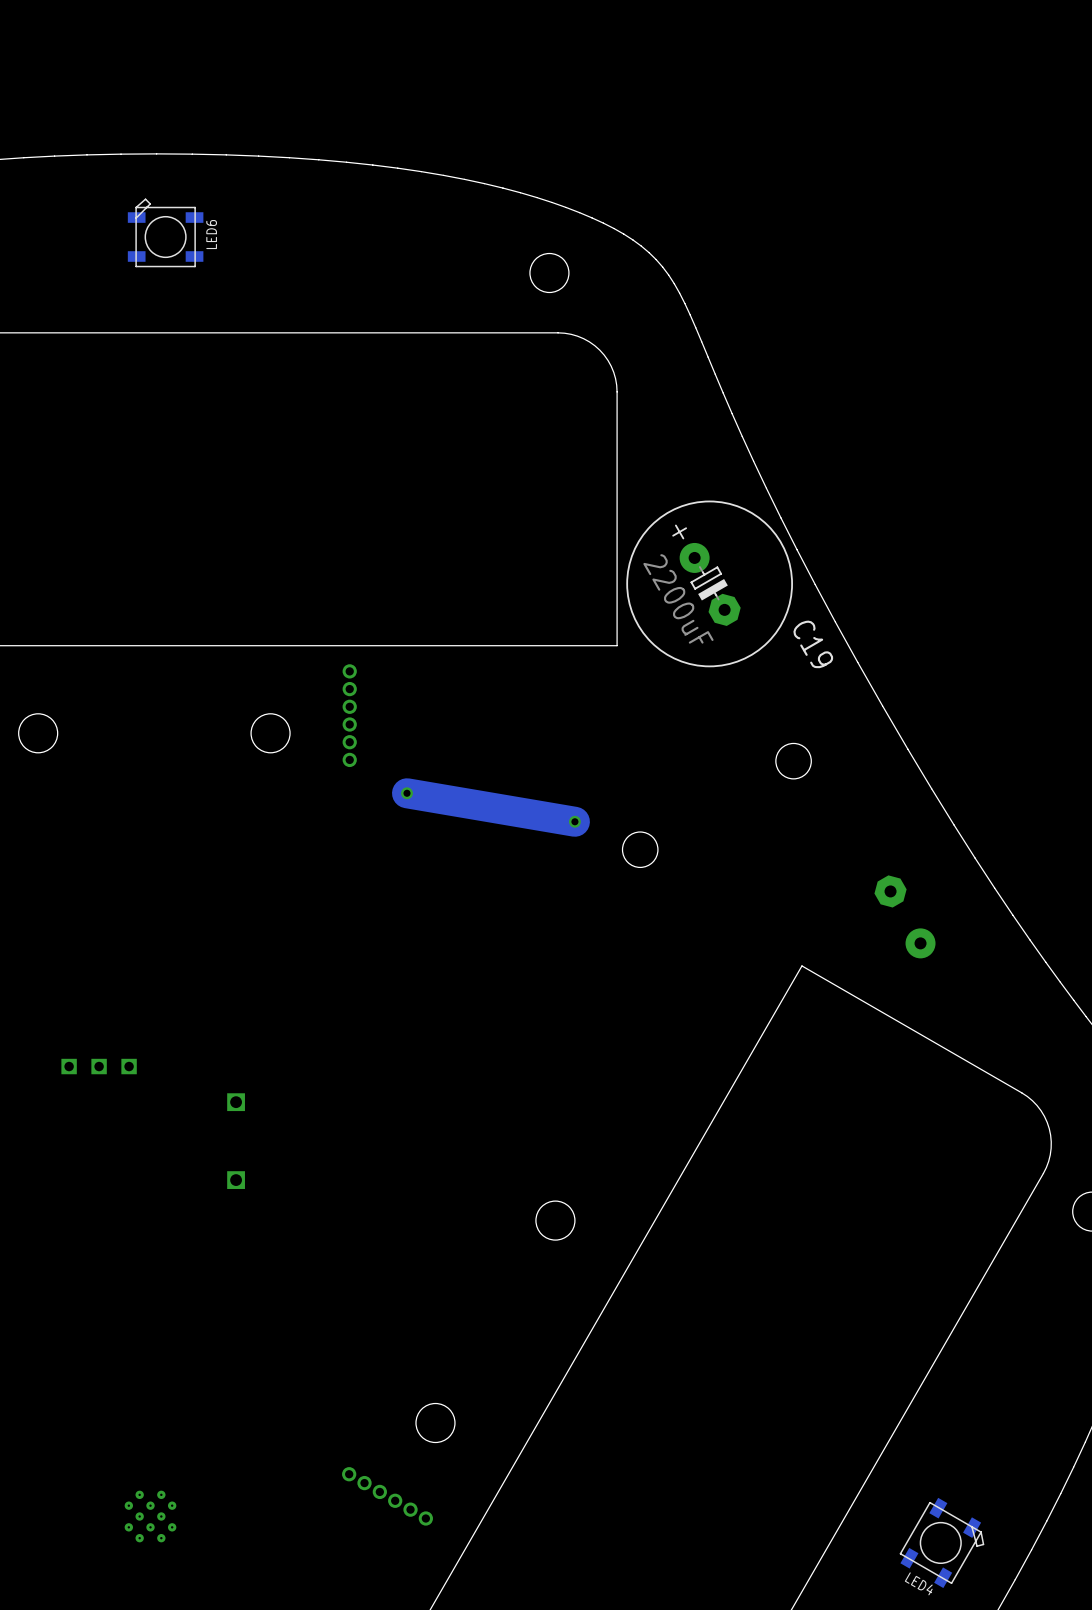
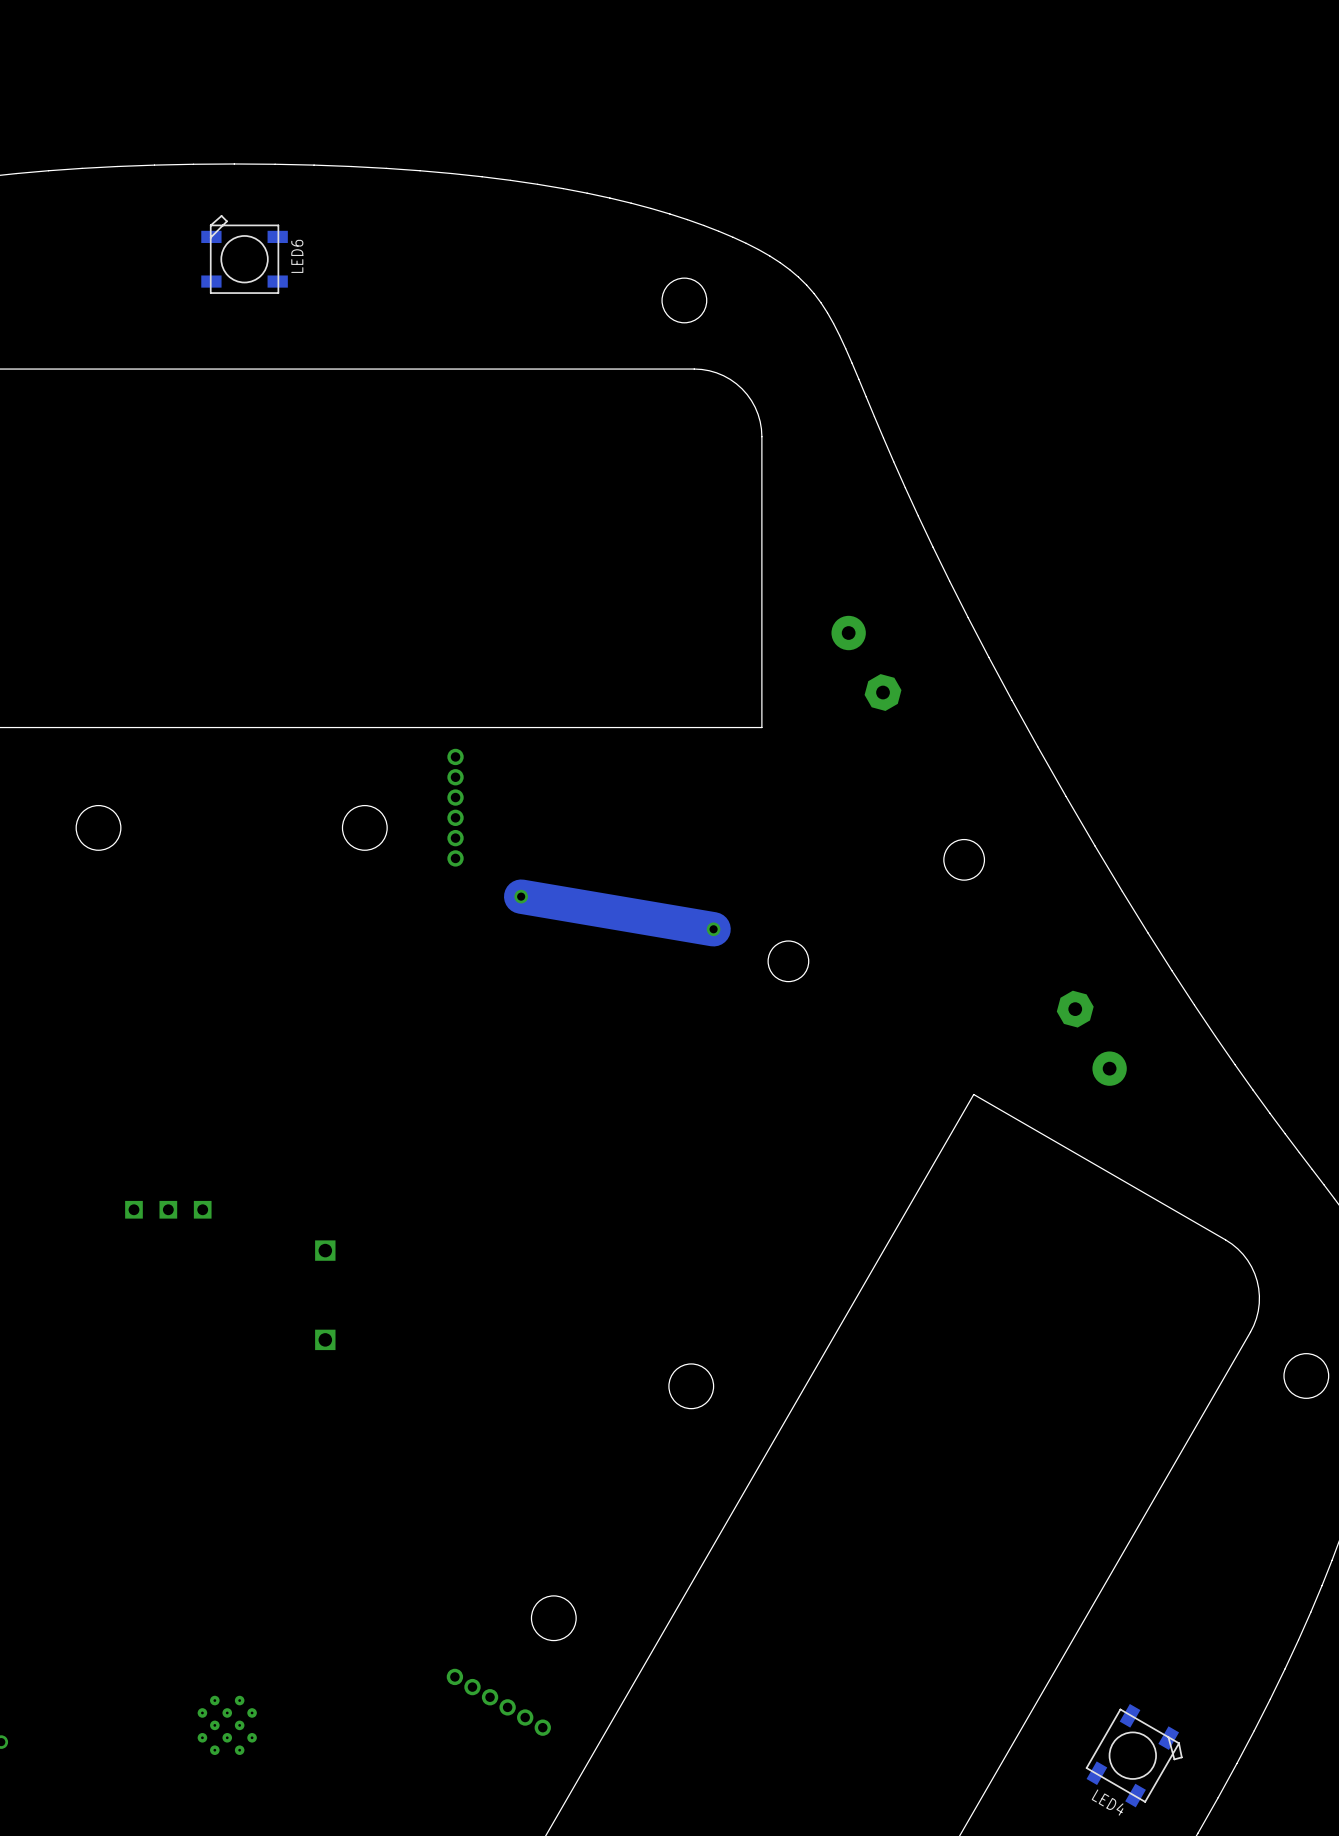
C19 side: bottom (709, 583) -> top (866, 663)

